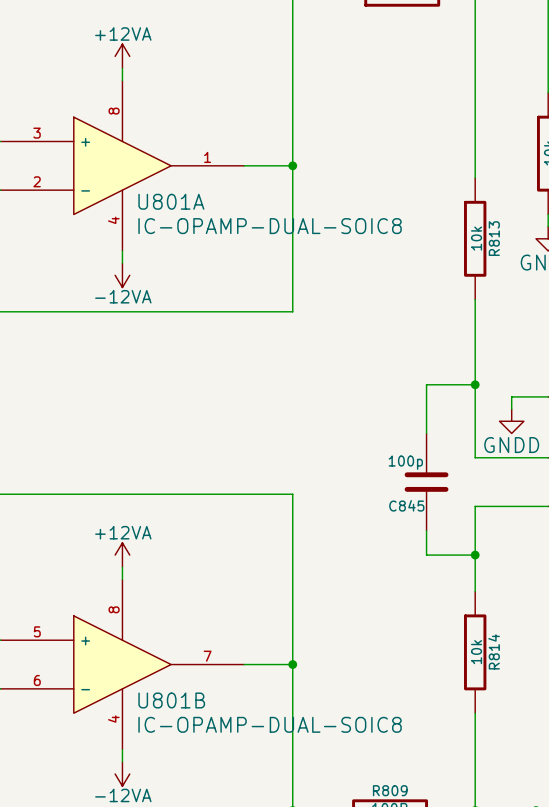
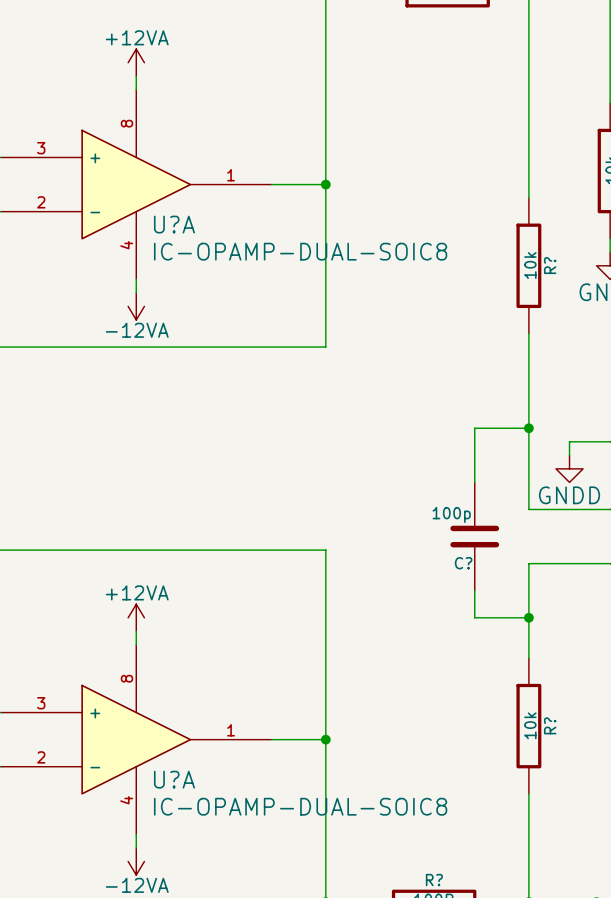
U801A name: U801A (171, 201) -> U?A (174, 224)
R813 name: R813 (494, 238) -> R? (550, 265)
C845 name: C845 (406, 505) -> C? (463, 563)
U801B pin number: 5 (37, 631) -> 3 (41, 703)
R814 name: R814 (494, 651) -> R? (550, 725)
U801B pin number: 7 (207, 656) -> 1 (231, 730)
U801B pin number: 6 (37, 680) -> 2 (41, 757)
U801B name: U801B (171, 700) -> U?A (174, 779)
R809 name: R809 (390, 790) -> R? (434, 880)

